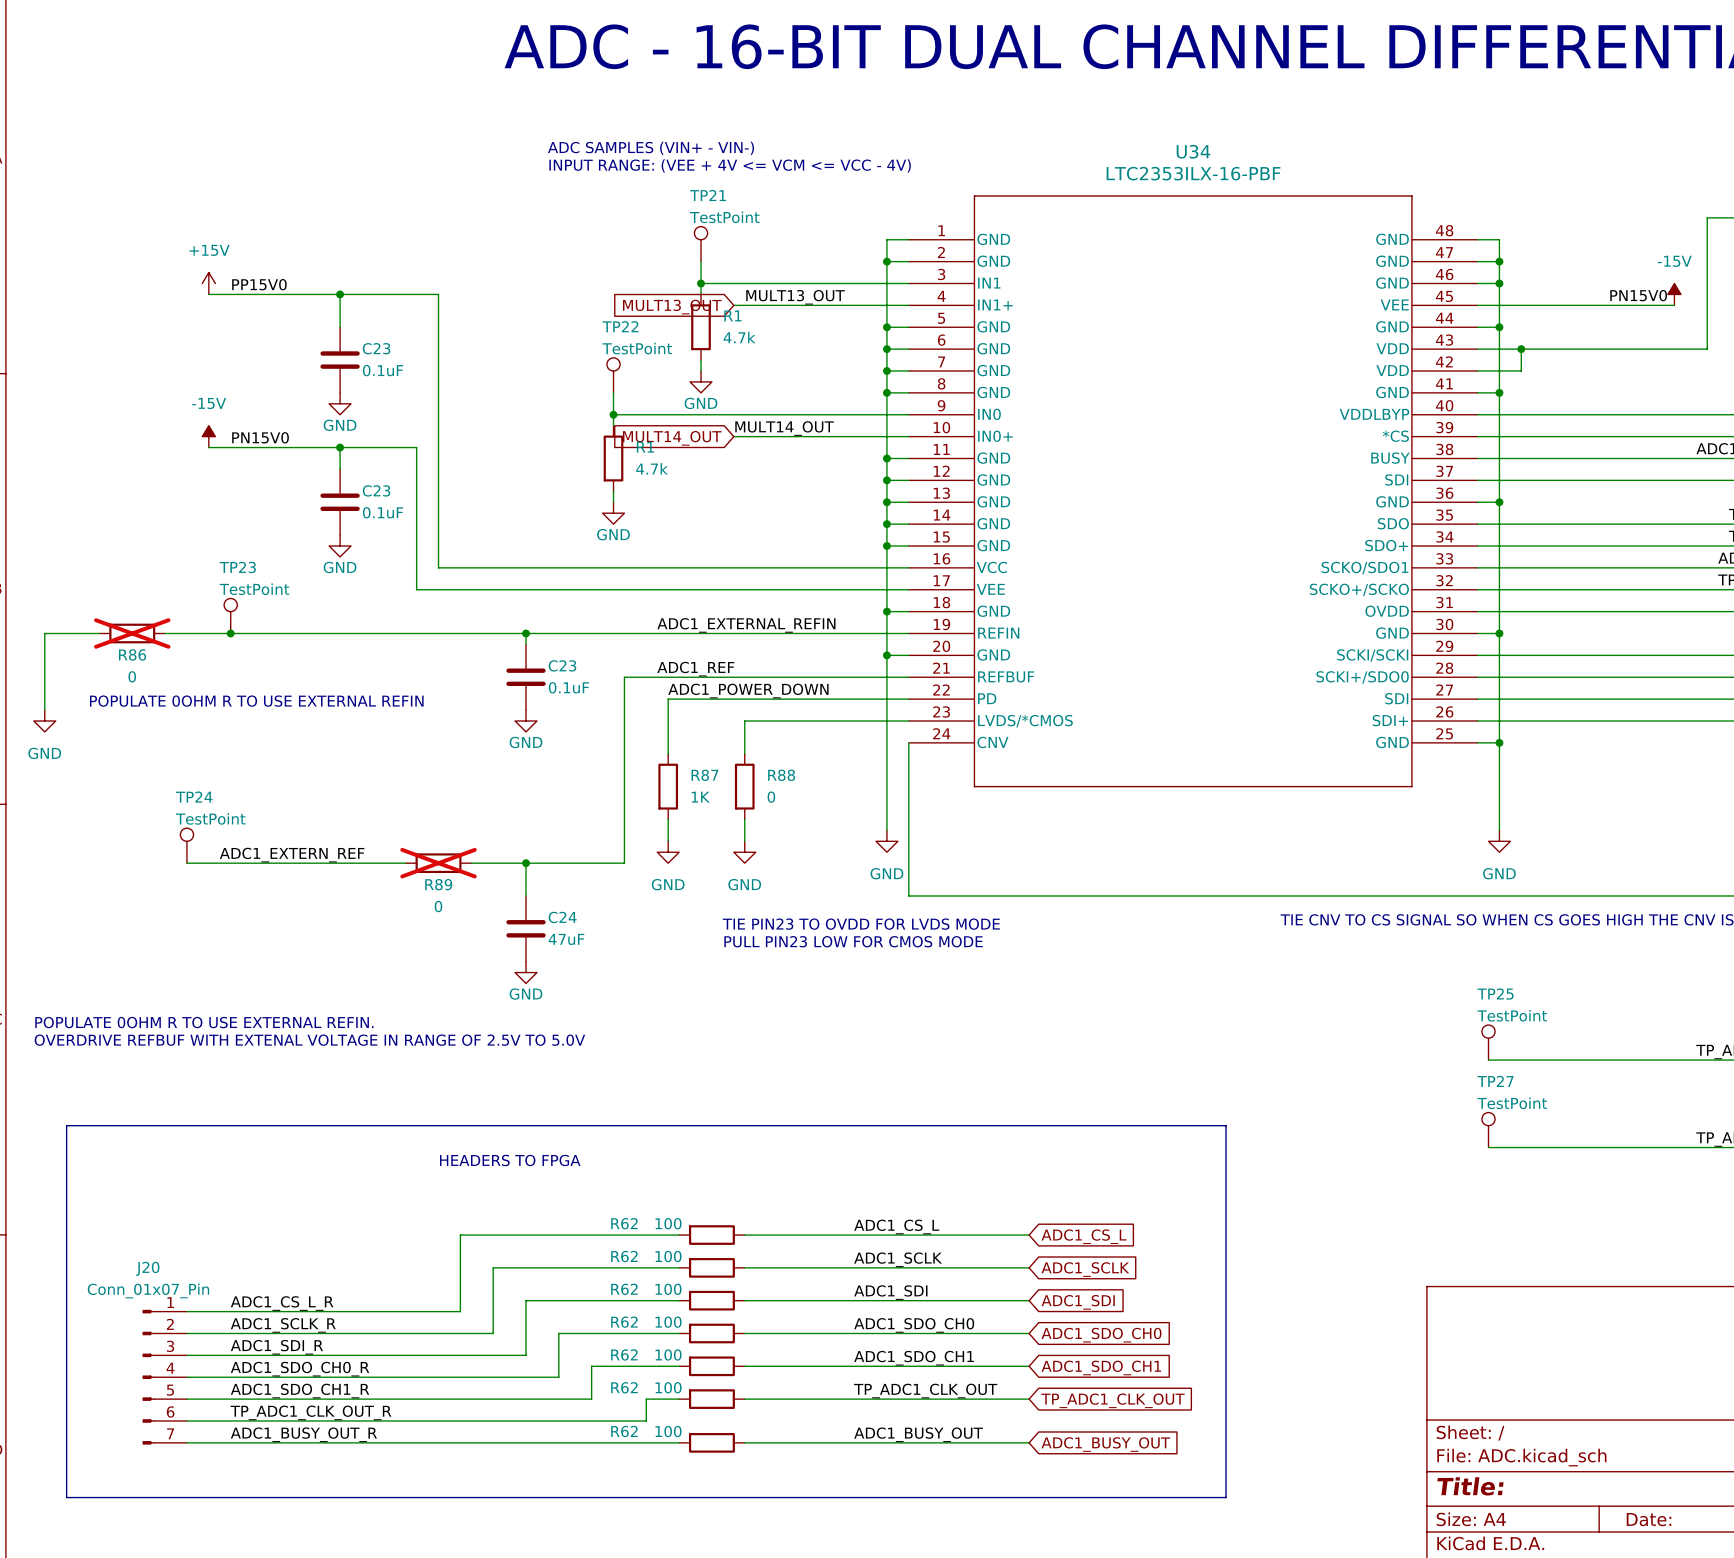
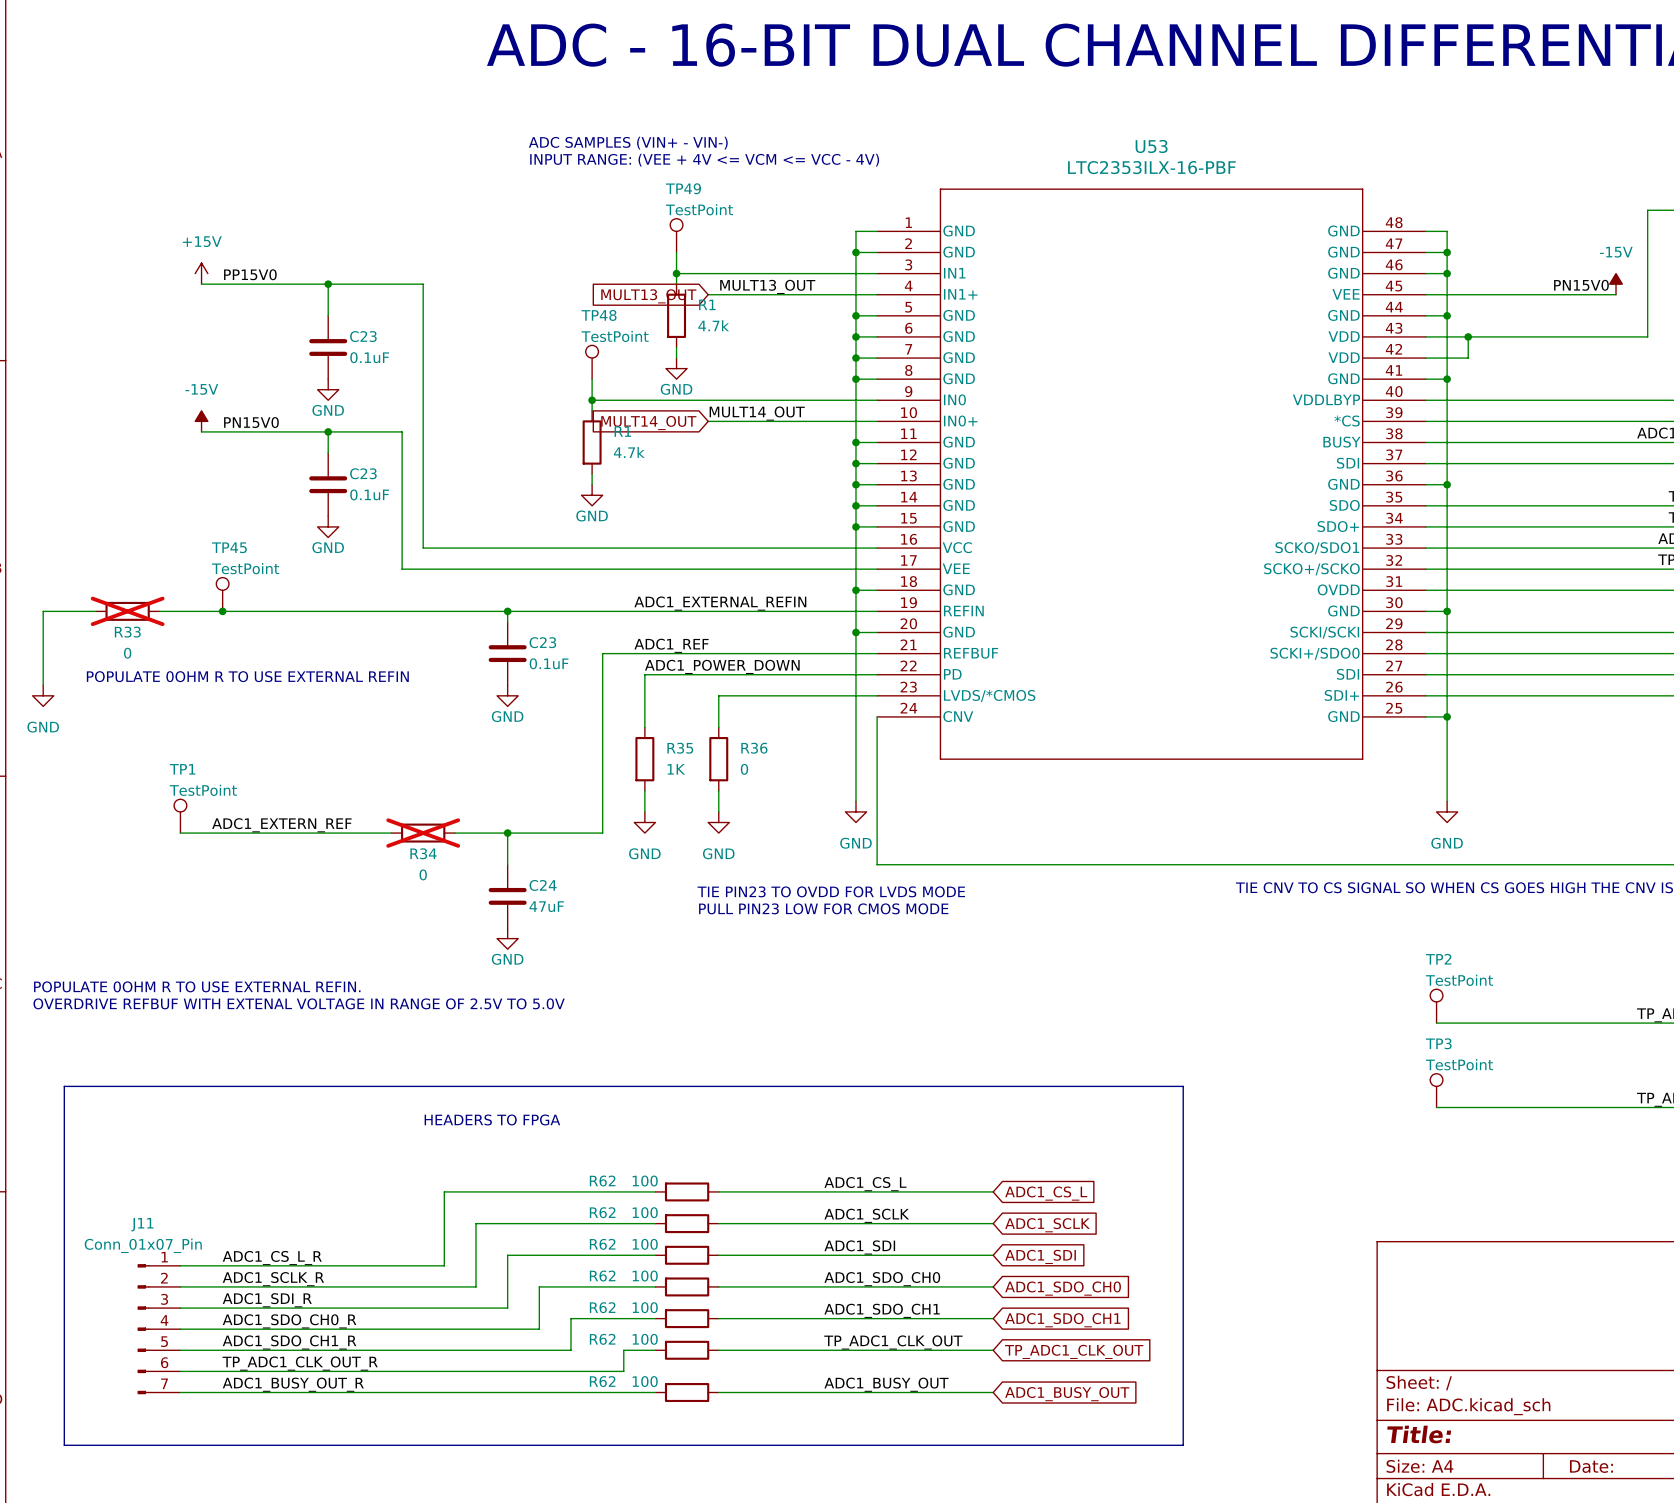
U34 name: U34 (1193, 151) -> U53 (1151, 146)
TP21 name: TP21 (708, 195) -> TP49 (683, 188)
TP22 name: TP22 (620, 326) -> TP48 (599, 315)
TP23 name: TP23 (237, 567) -> TP45 (229, 547)
R86 name: R86 (132, 654) -> R33 (127, 632)
R87 name: R87 (704, 775) -> R35 (680, 748)
R88 name: R88 (781, 775) -> R36 (754, 748)
TP24 name: TP24 (194, 797) -> TP1 (182, 769)
R89 name: R89 (438, 884) -> R34 (423, 853)
TP25 name: TP25 (1495, 994) -> TP2 (1438, 959)
TP27 name: TP27 (1495, 1081) -> TP3 (1438, 1043)
J20 name: J20 (147, 1268) -> J11 (142, 1224)

